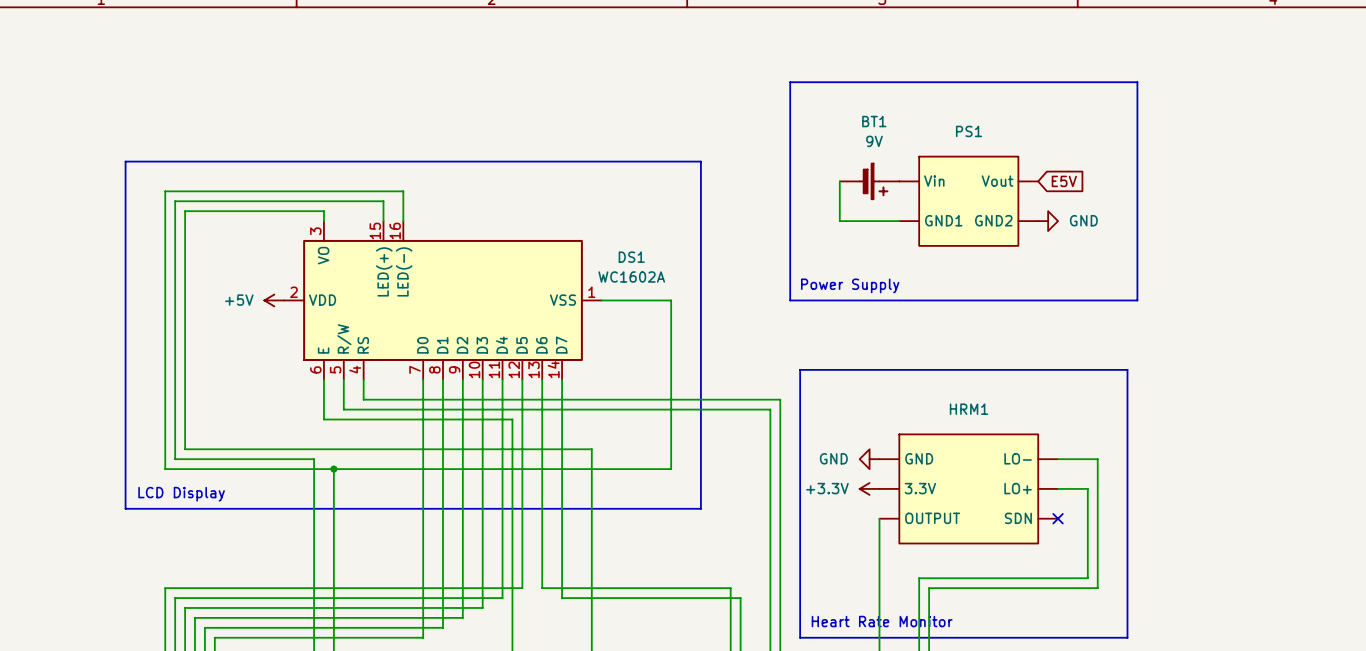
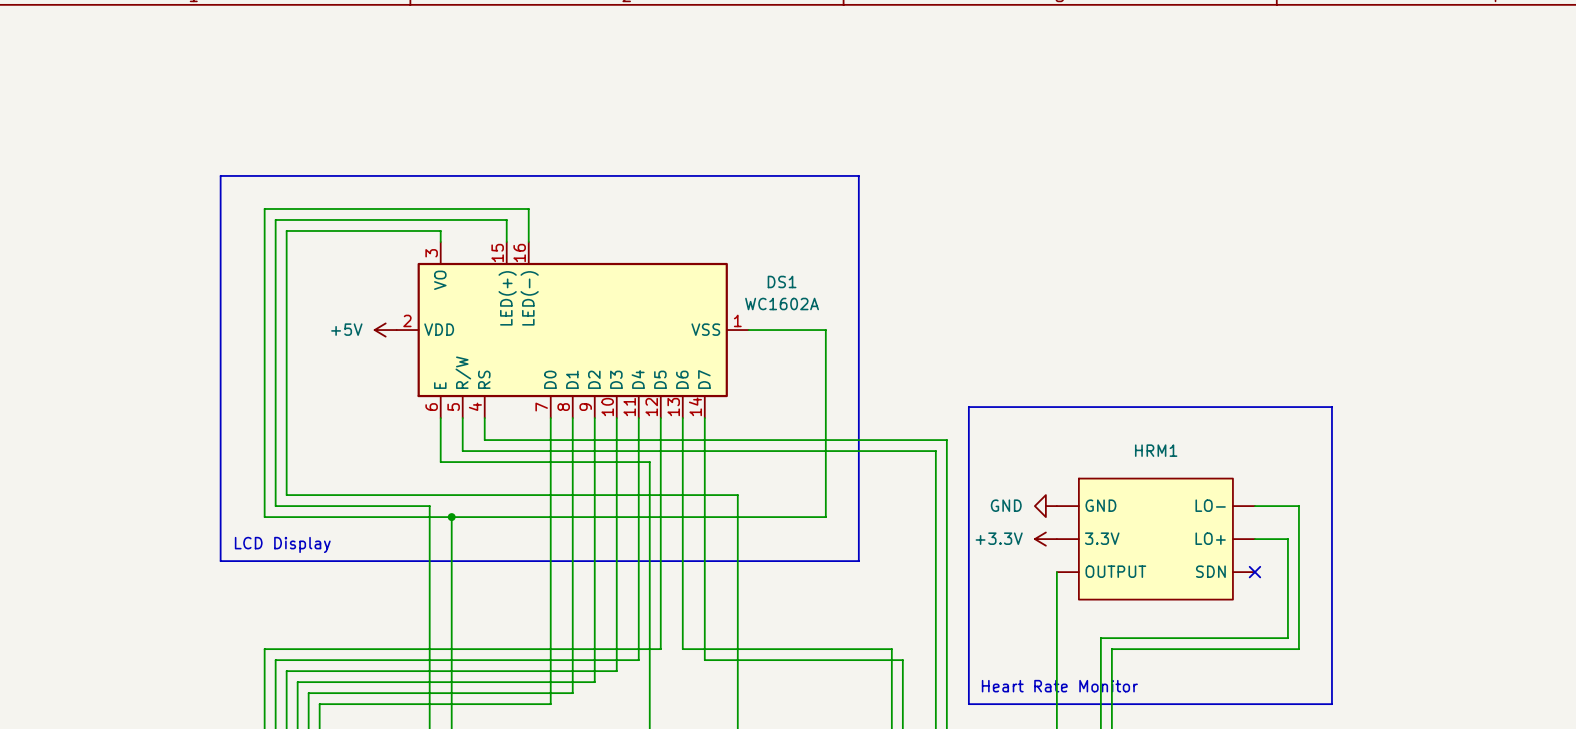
line: (790, 82) (1137, 82) (1137, 300) (790, 300) (790, 82) -> none
wire: (839, 181) (839, 221) (899, 221) -> none
BT1: 9V (869, 181) -> none
global label: E5V (1064, 181) -> none
PS1: (968, 201) -> none
power symbol: GND (1048, 221) -> none
text: Power Supply (850, 285) -> none

